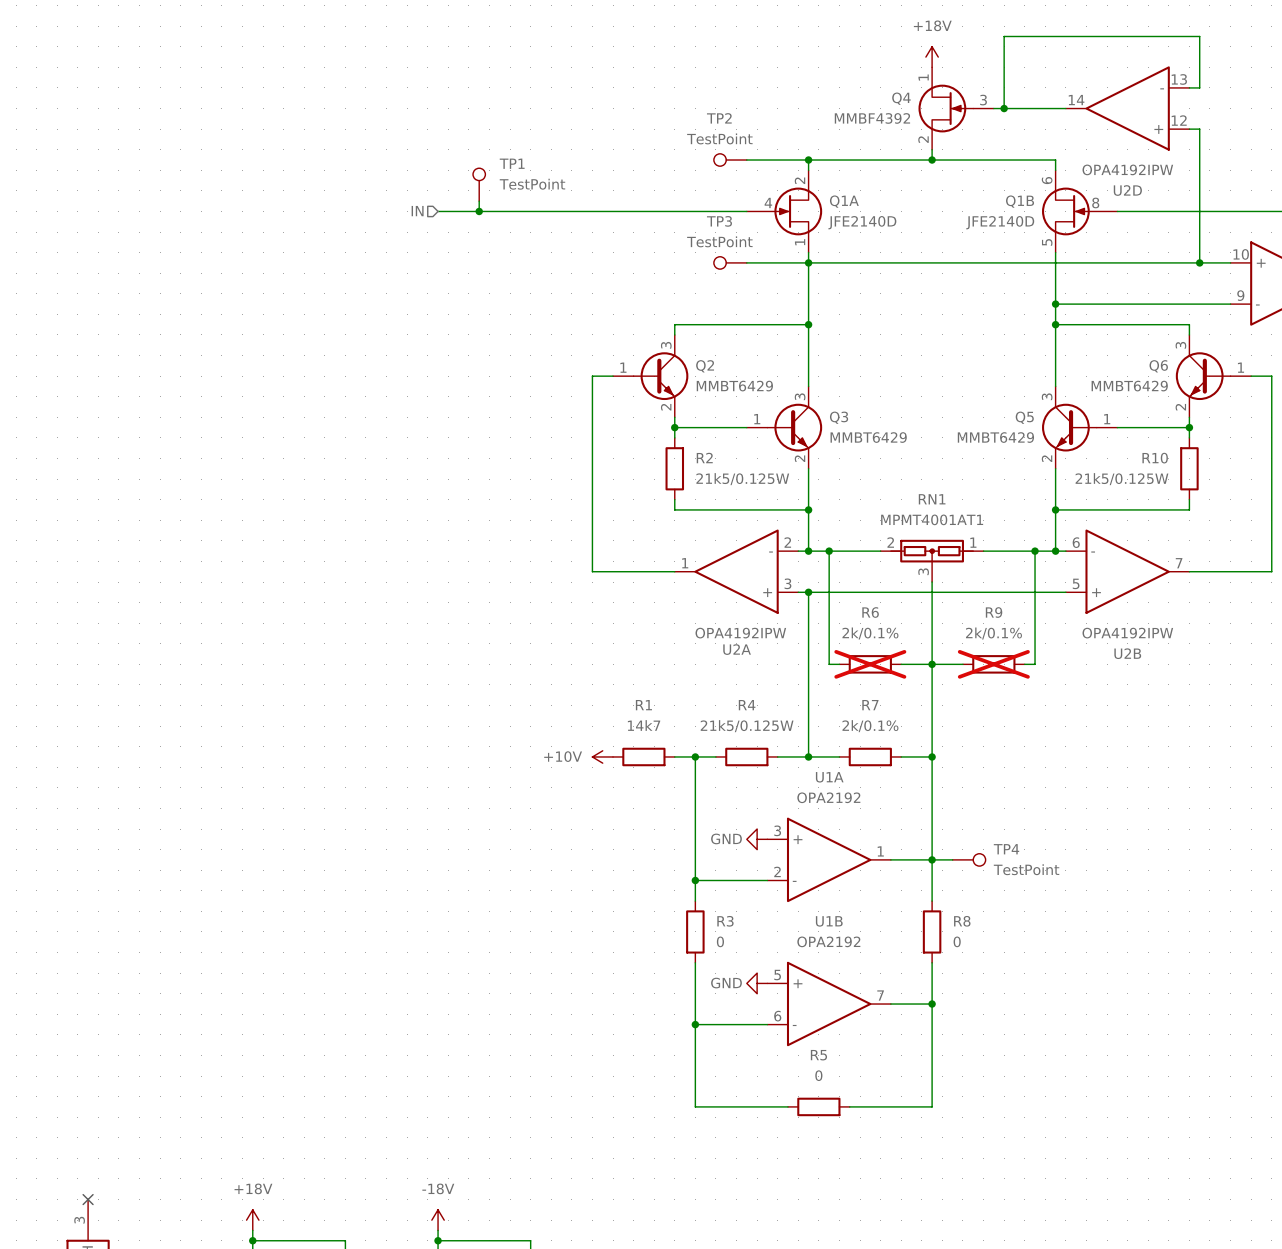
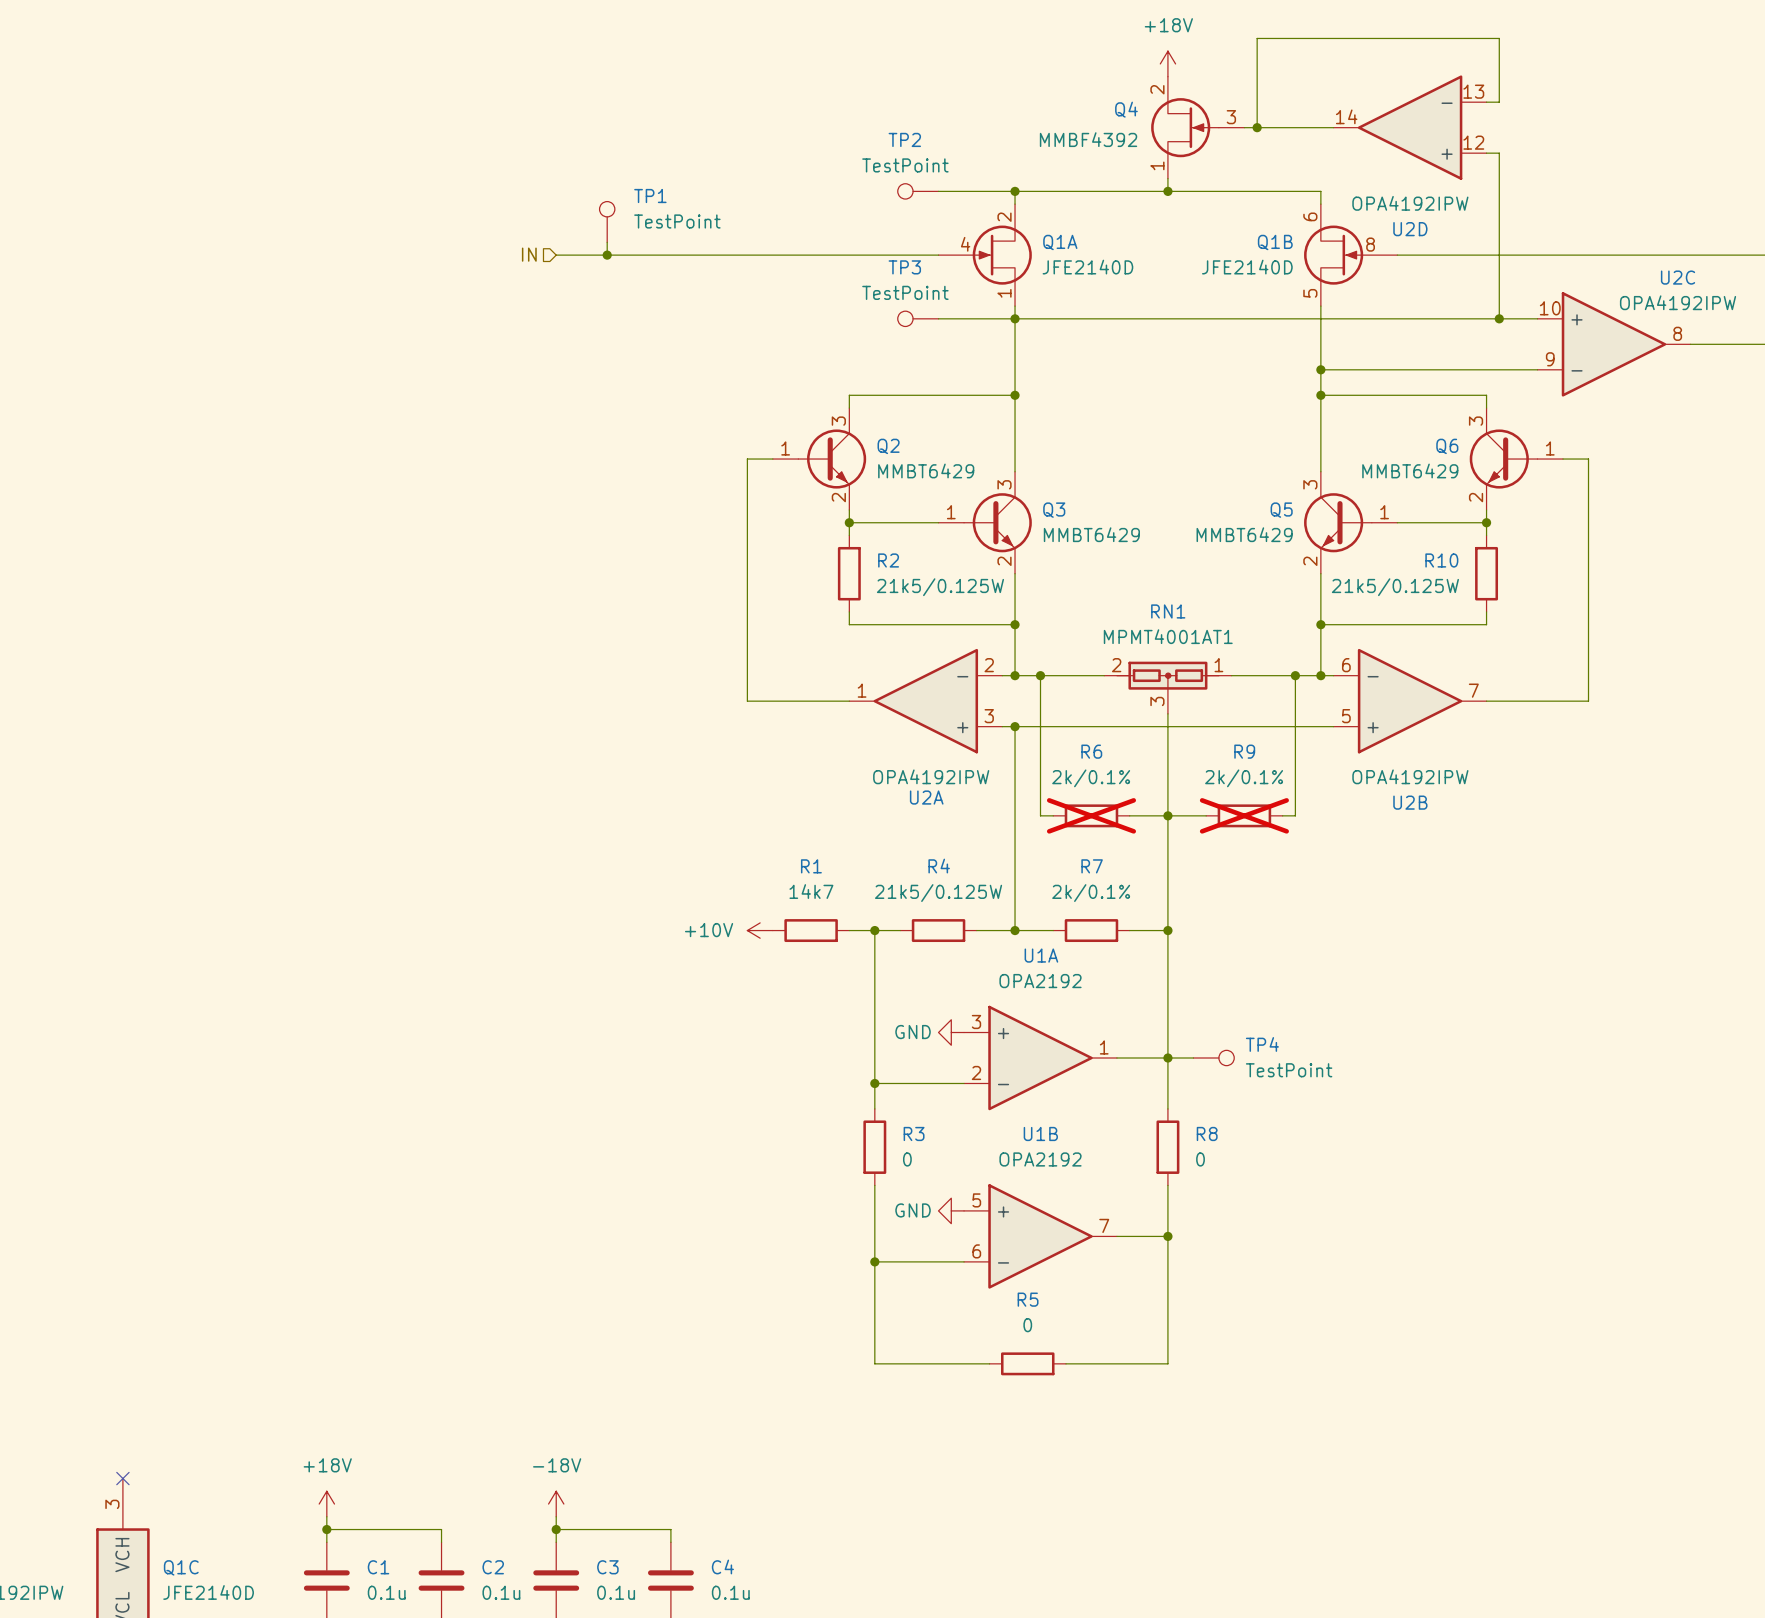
Q4 flip: as is (945, 108) -> up-down (1185, 127)

